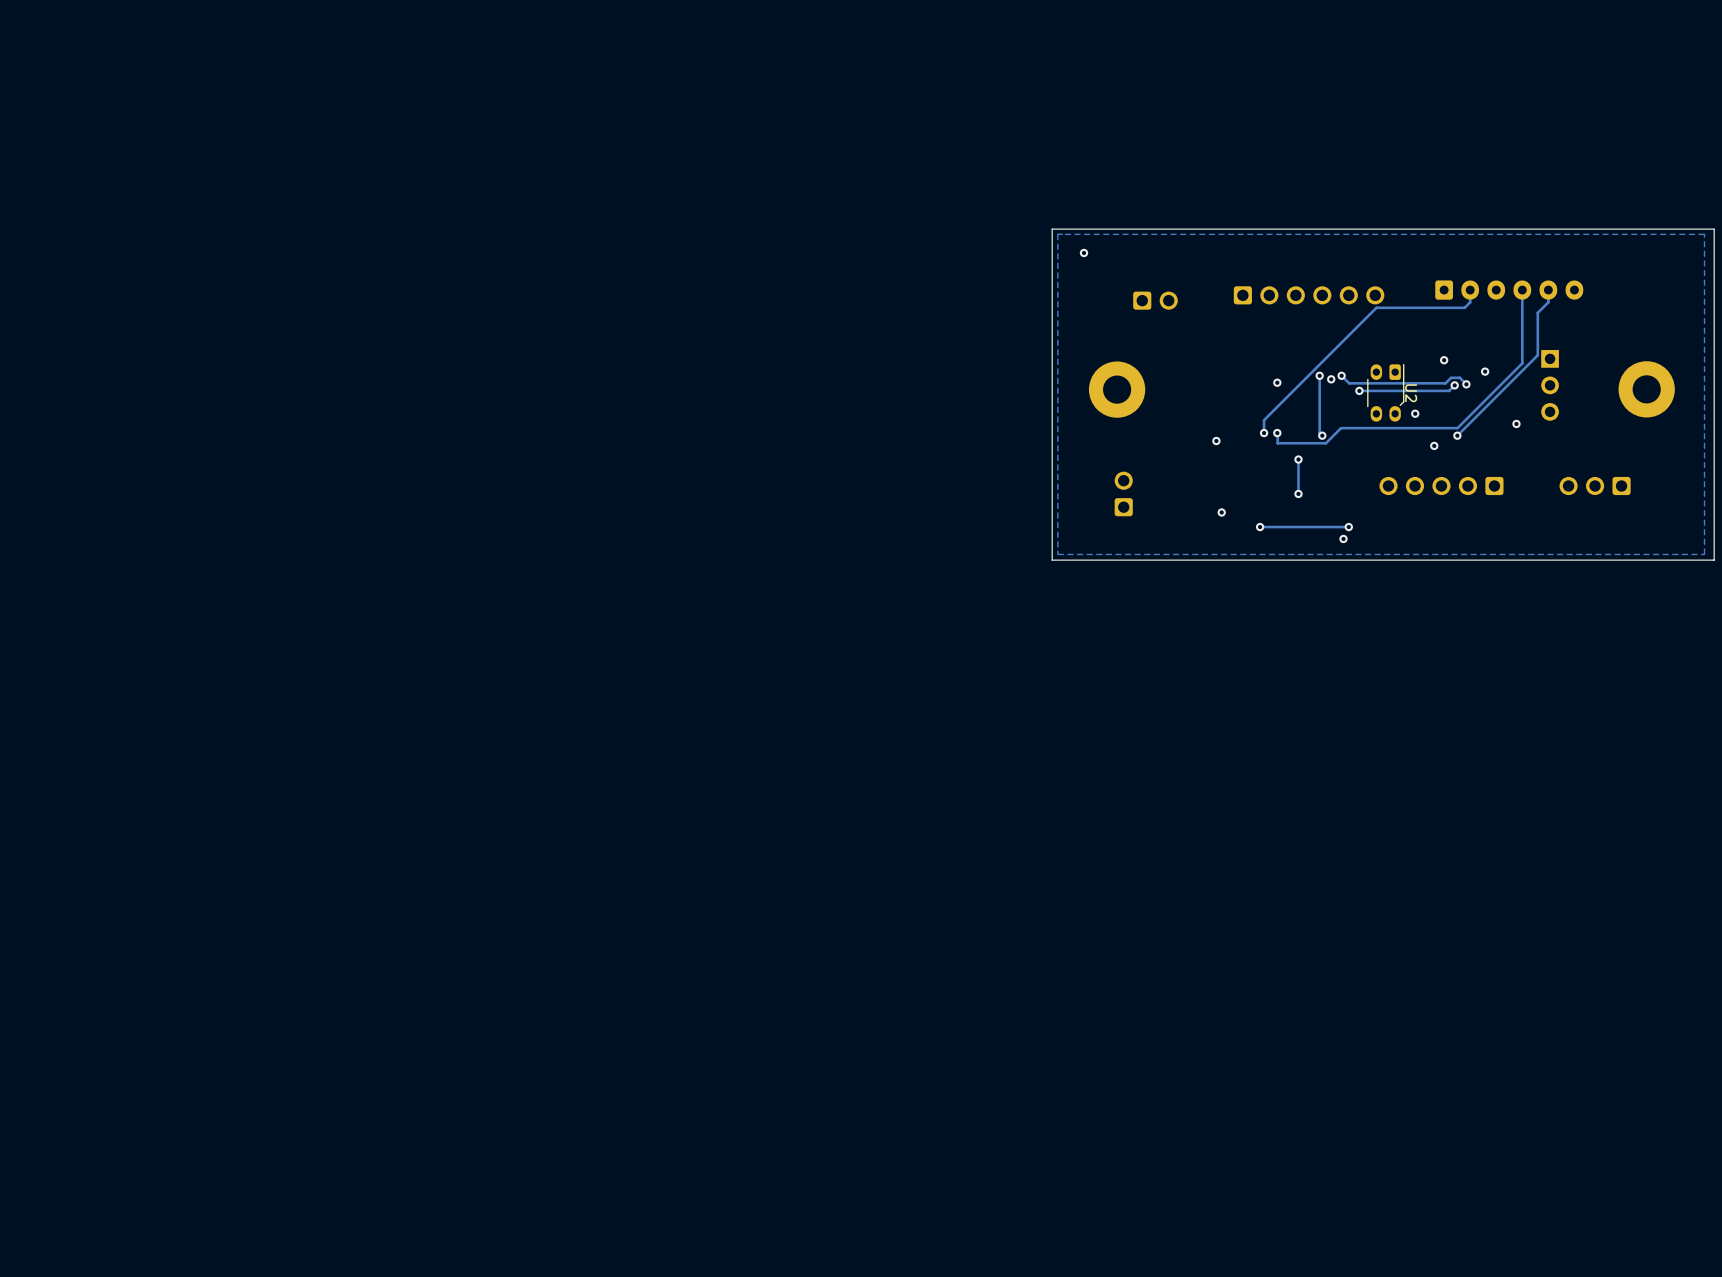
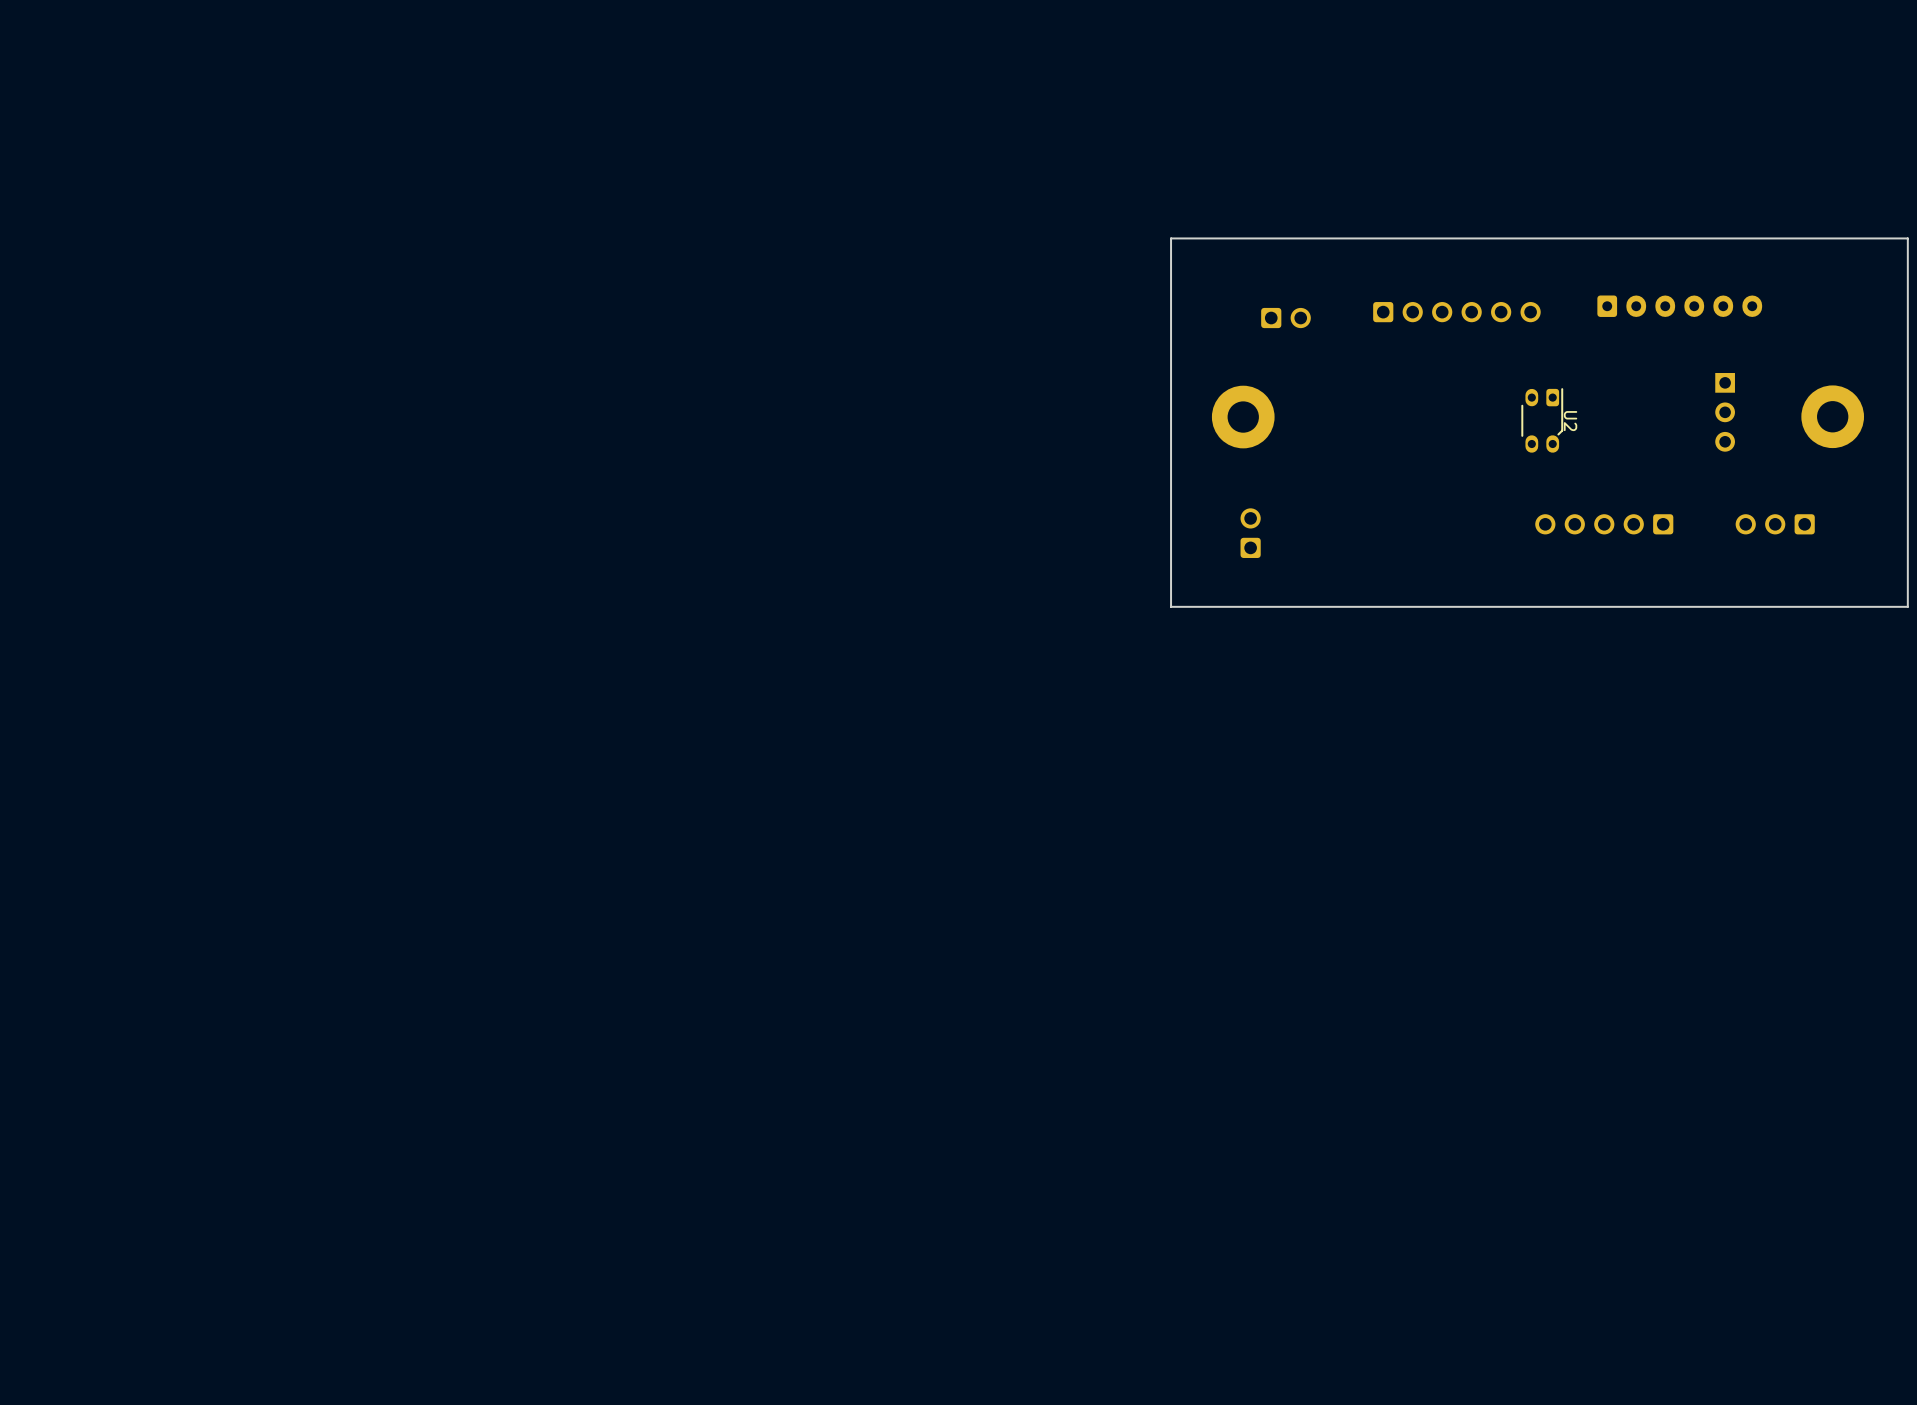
zone outline: (1057, 234) (1704, 234) (1704, 554) (1057, 554) (1057, 234) -> none
via: (1084, 252) -> none
track: (1470, 290) (1470, 302) (1464, 307) (1376, 307) (1264, 420) (1264, 433) -> none
track: (1522, 290) (1522, 363) (1457, 428) (1341, 428) (1325, 443) (1277, 443) (1277, 433) -> none
track: (1548, 290) (1548, 302) (1537, 312) (1537, 355) (1457, 435) -> none
via: (1444, 360) -> none
via: (1485, 371) -> none
track: (1319, 375) (1319, 433) (1322, 435) -> none
via: (1319, 375) -> none
track: (1341, 375) (1349, 383) (1445, 383) (1451, 377) (1459, 377) (1466, 384) -> none
via: (1341, 375) -> none
via: (1331, 379) -> none
via: (1277, 382) -> none
via: (1466, 384) -> none
track: (1454, 385) (1449, 390) (1359, 390) -> none
via: (1454, 385) -> none
via: (1359, 390) -> none
via: (1415, 413) -> none
via: (1516, 423) -> none
via: (1264, 433) -> none
via: (1277, 433) -> none
via: (1322, 435) -> none
via: (1457, 435) -> none
via: (1216, 440) -> none
via: (1434, 445) -> none
track: (1298, 459) (1298, 493) -> none
via: (1298, 459) -> none
via: (1298, 493) -> none
via: (1221, 512) -> none
via: (1260, 527) -> none
track: (1348, 527) (1260, 527) -> none
via: (1348, 527) -> none
via: (1343, 538) -> none

